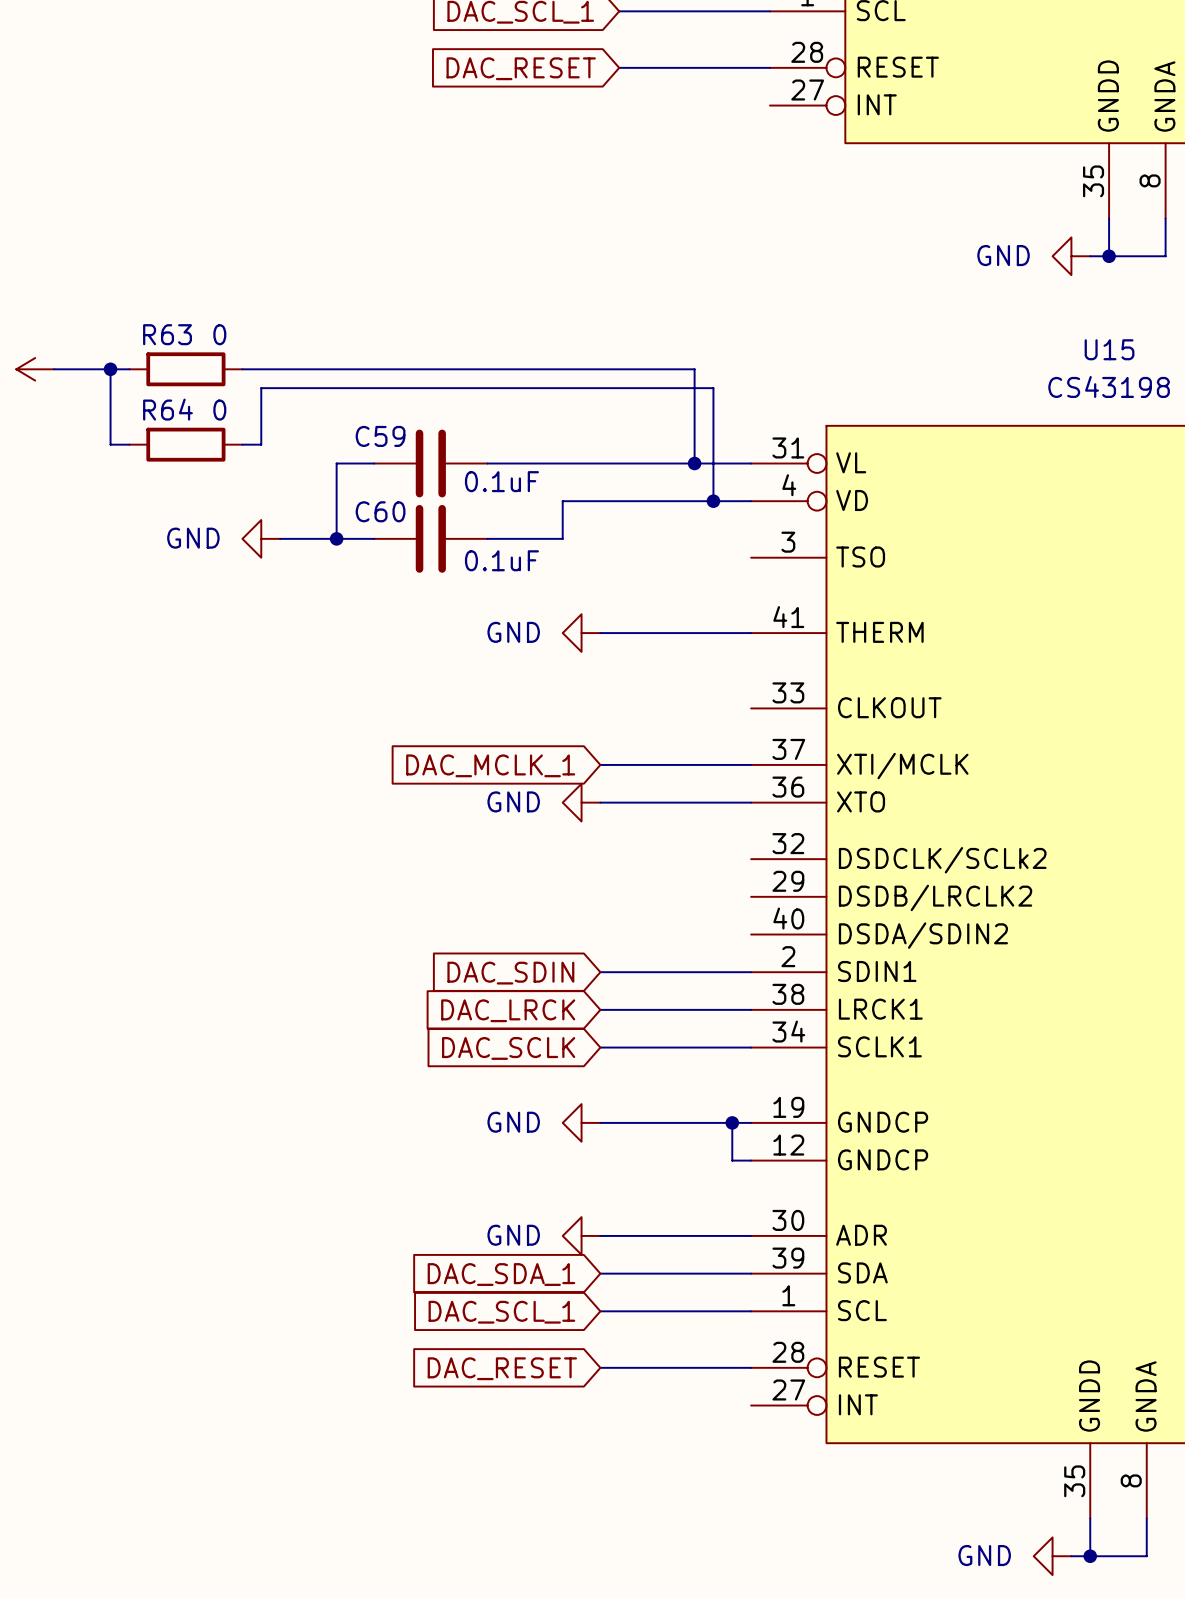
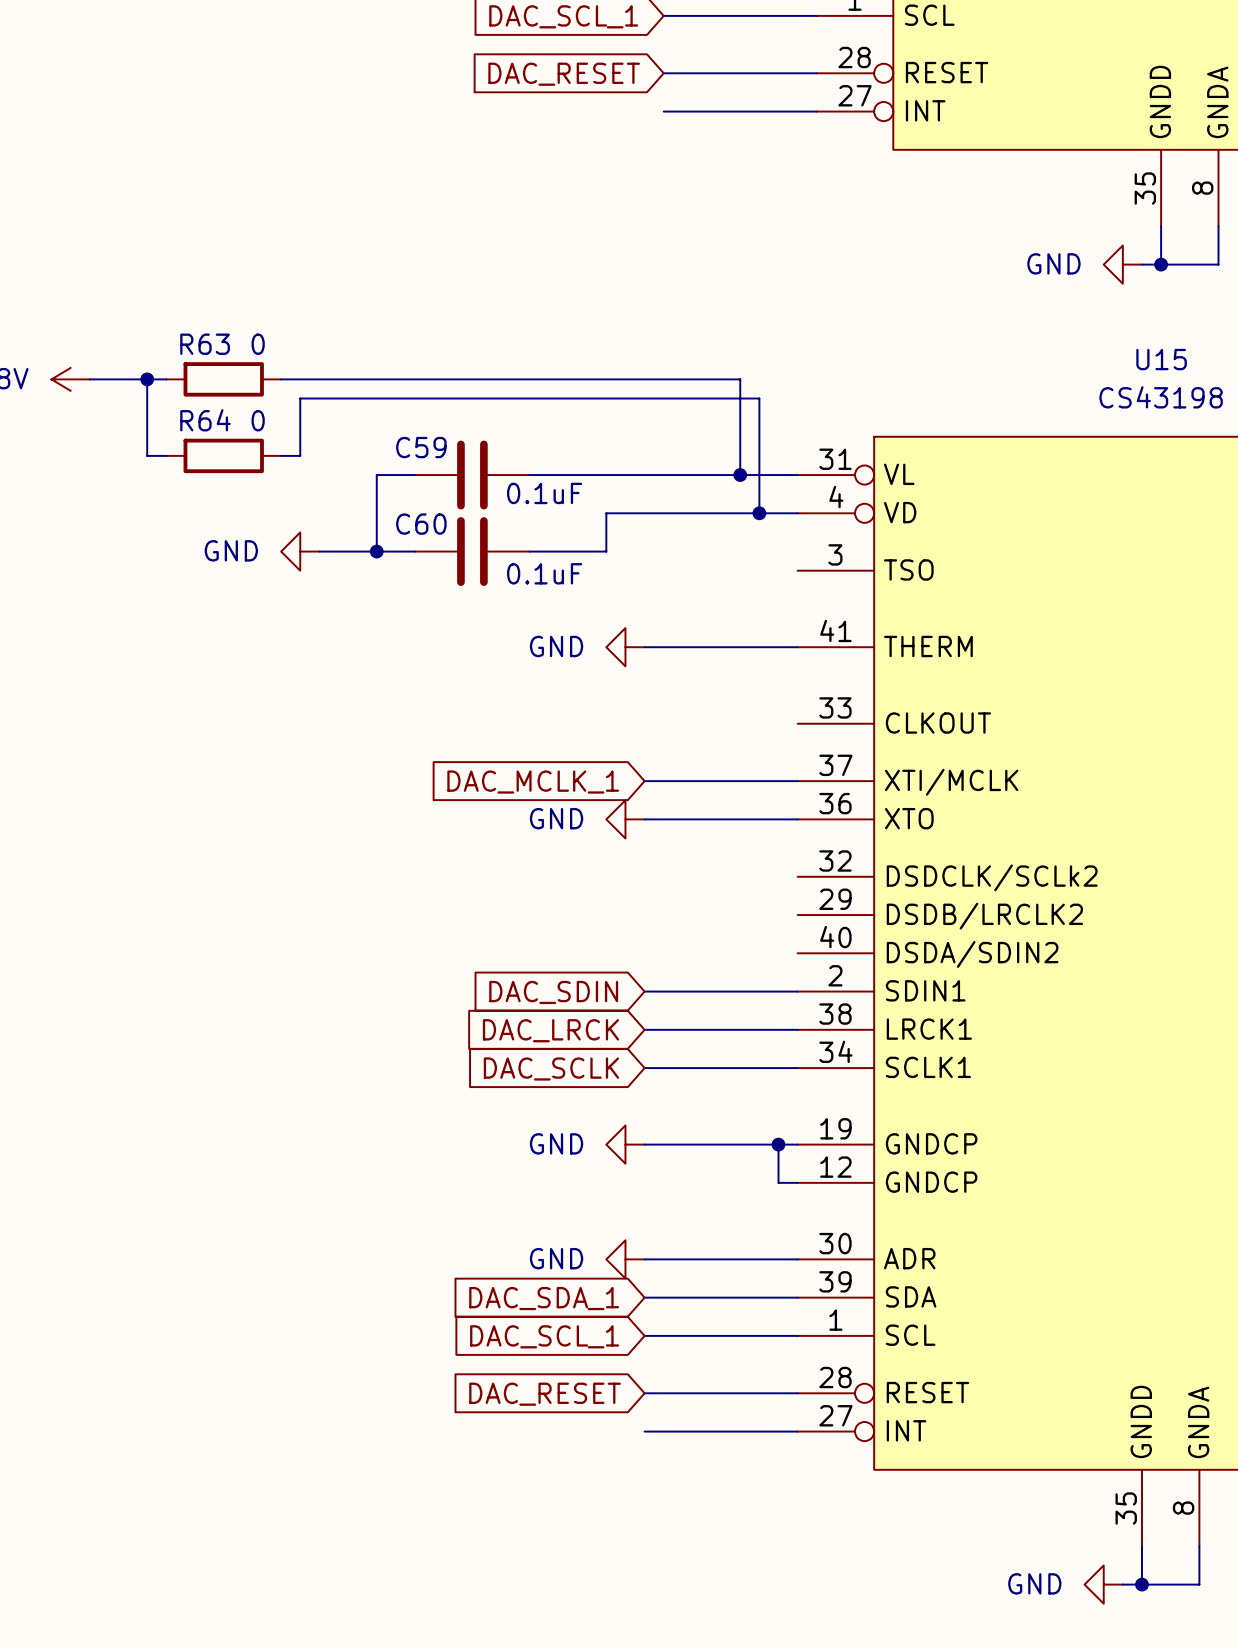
wire: none -> (663, 111) (816, 111)
wire: none -> (644, 1431) (797, 1431)

